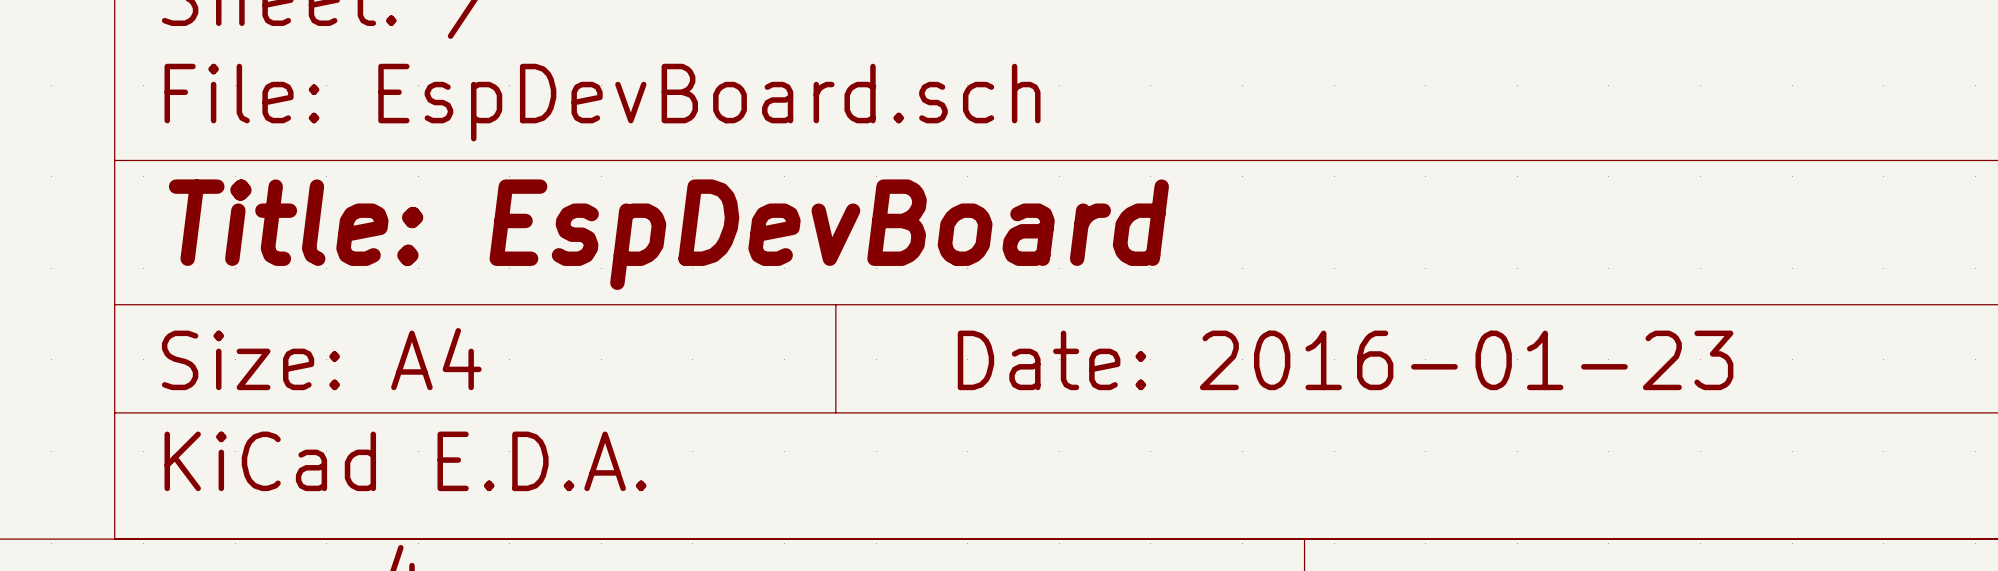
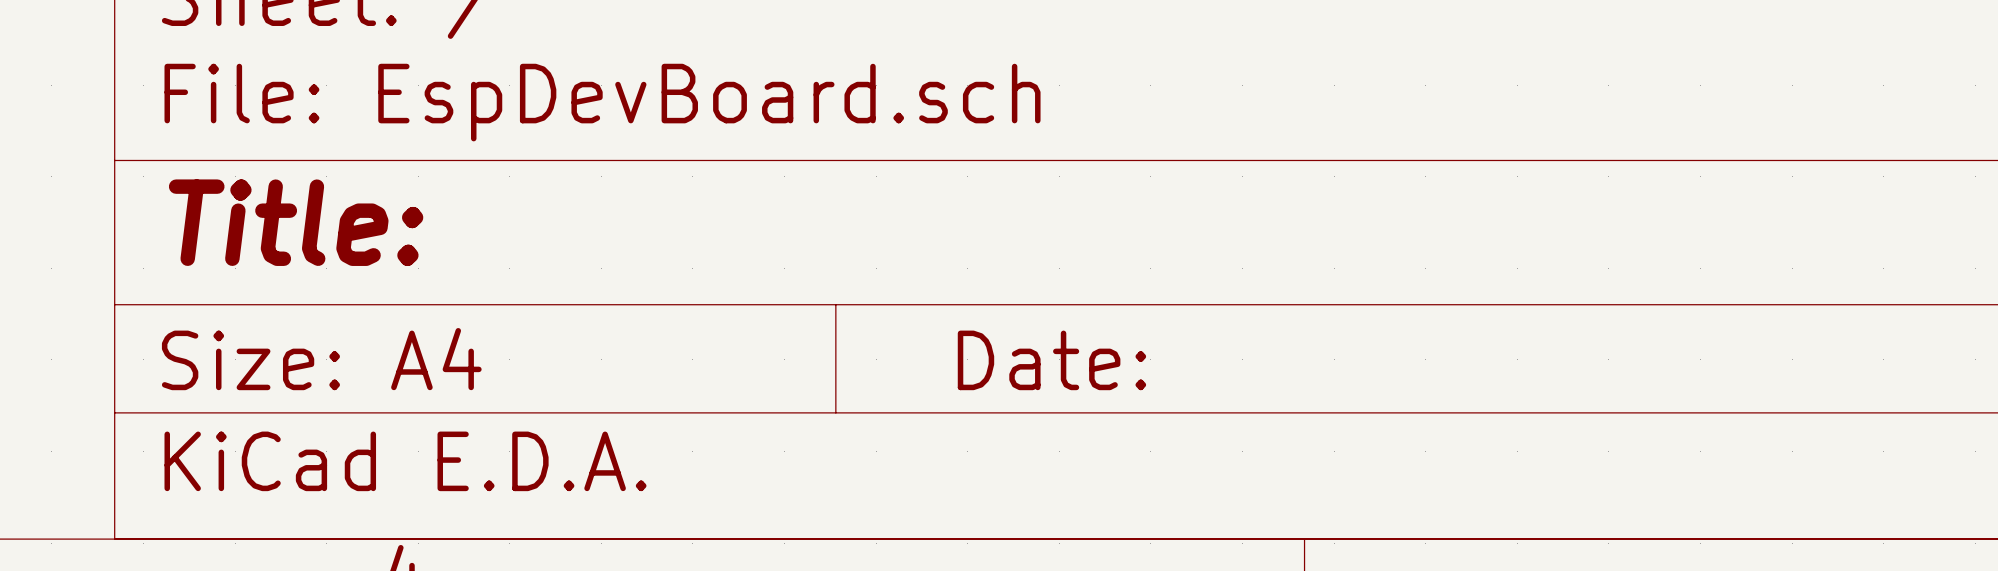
title block: Title: EspDevBoard (668, 234) -> Title: (296, 222)
title block: Date: 2016-01-23 (1345, 360) -> Date: (1051, 360)

